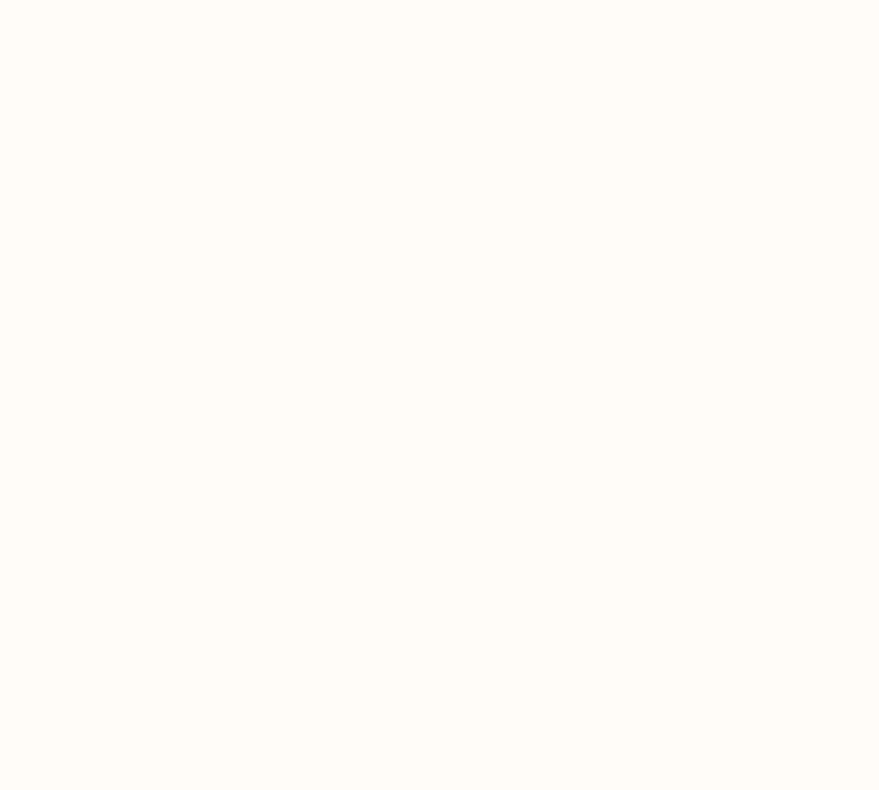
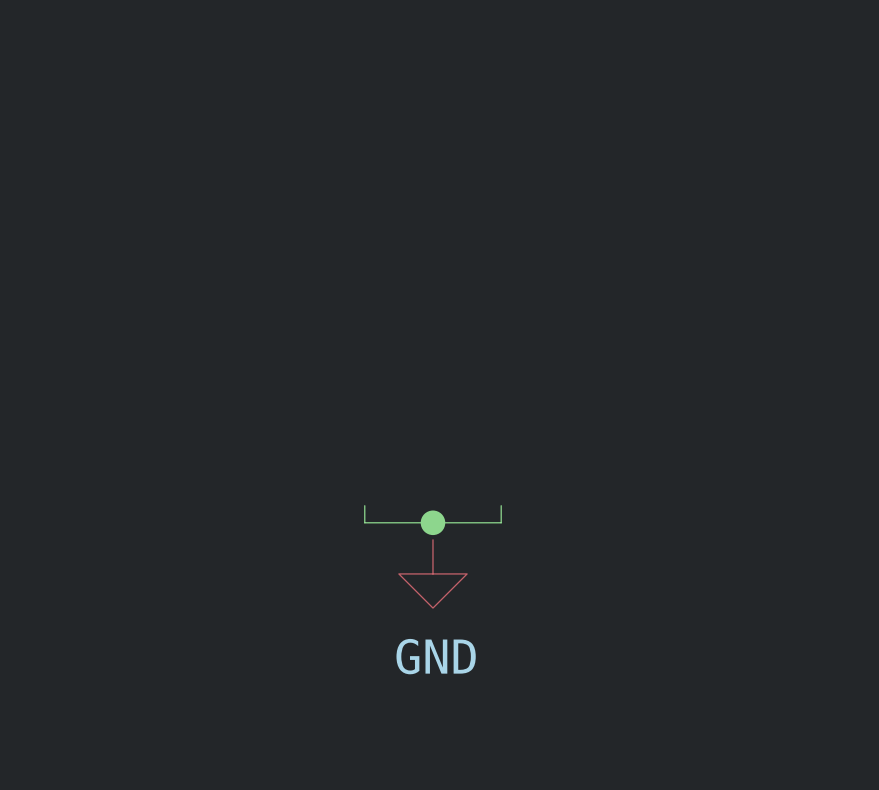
wire: none -> (364, 505) (364, 522) (501, 522) (501, 505)
junction: none -> (432, 522)
power symbol: none -> GND (432, 573)

